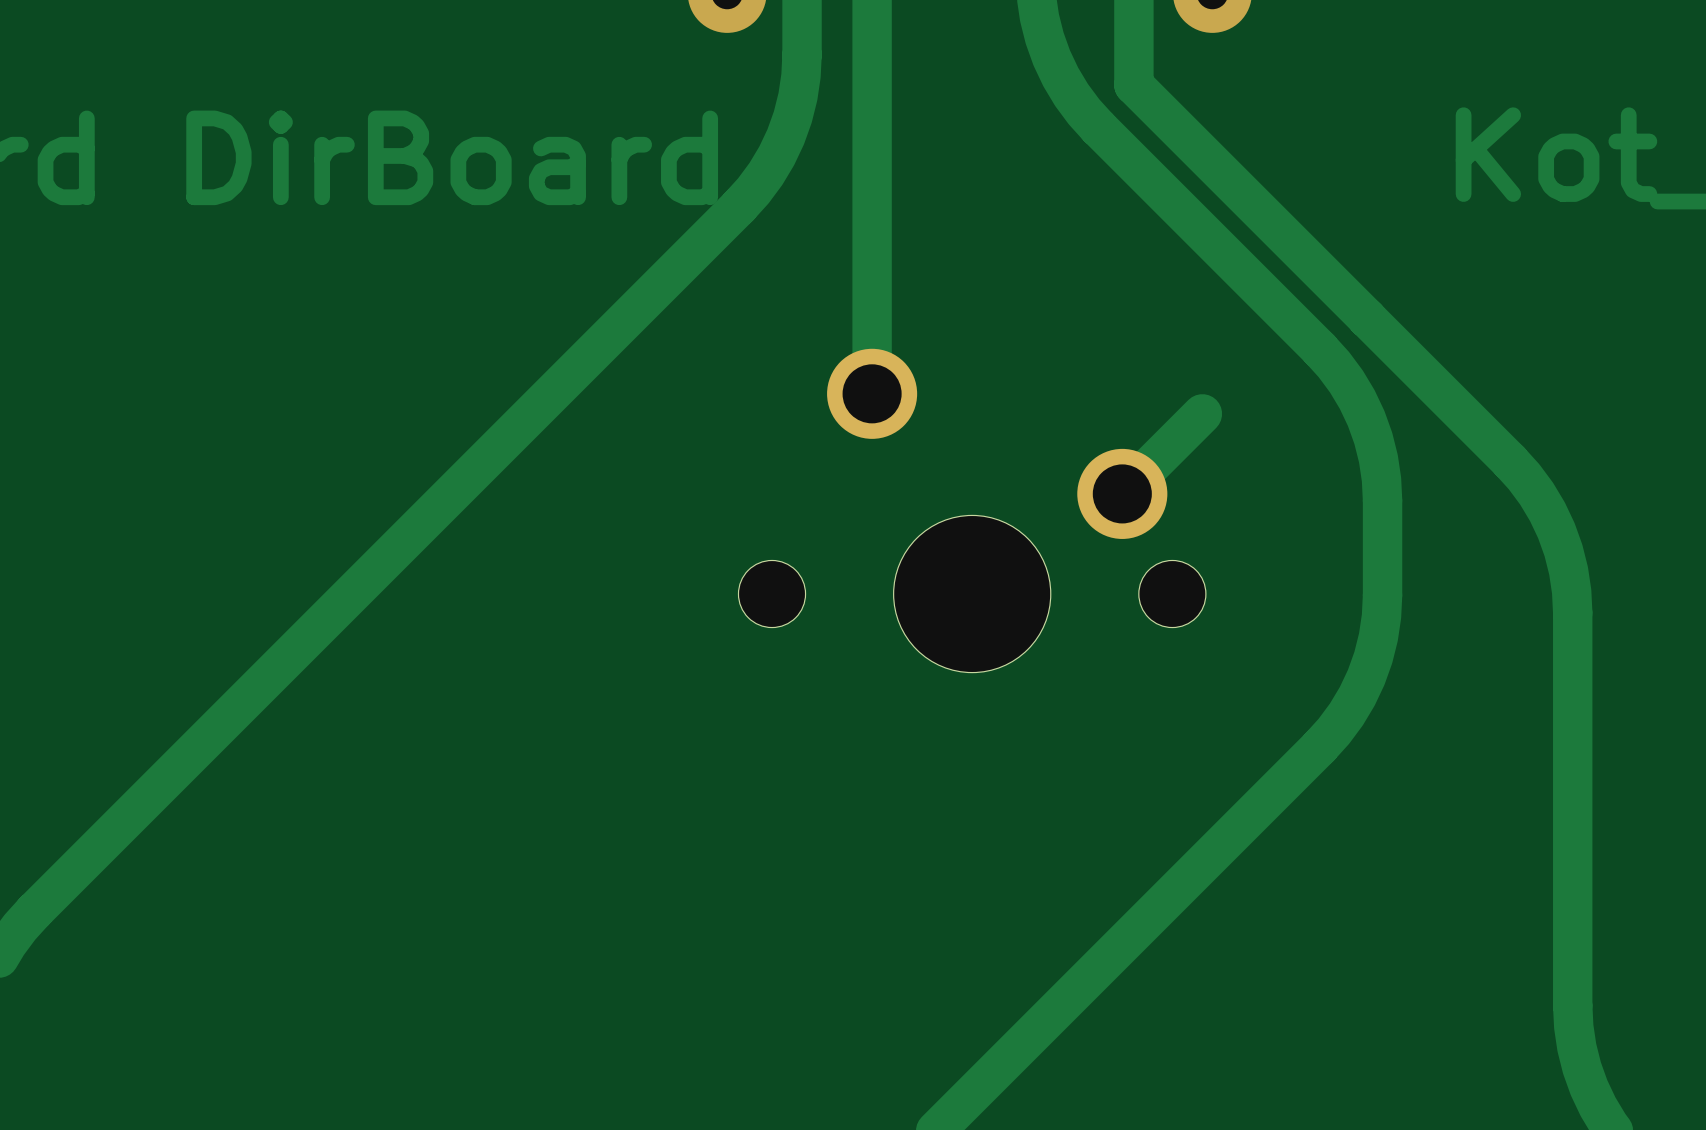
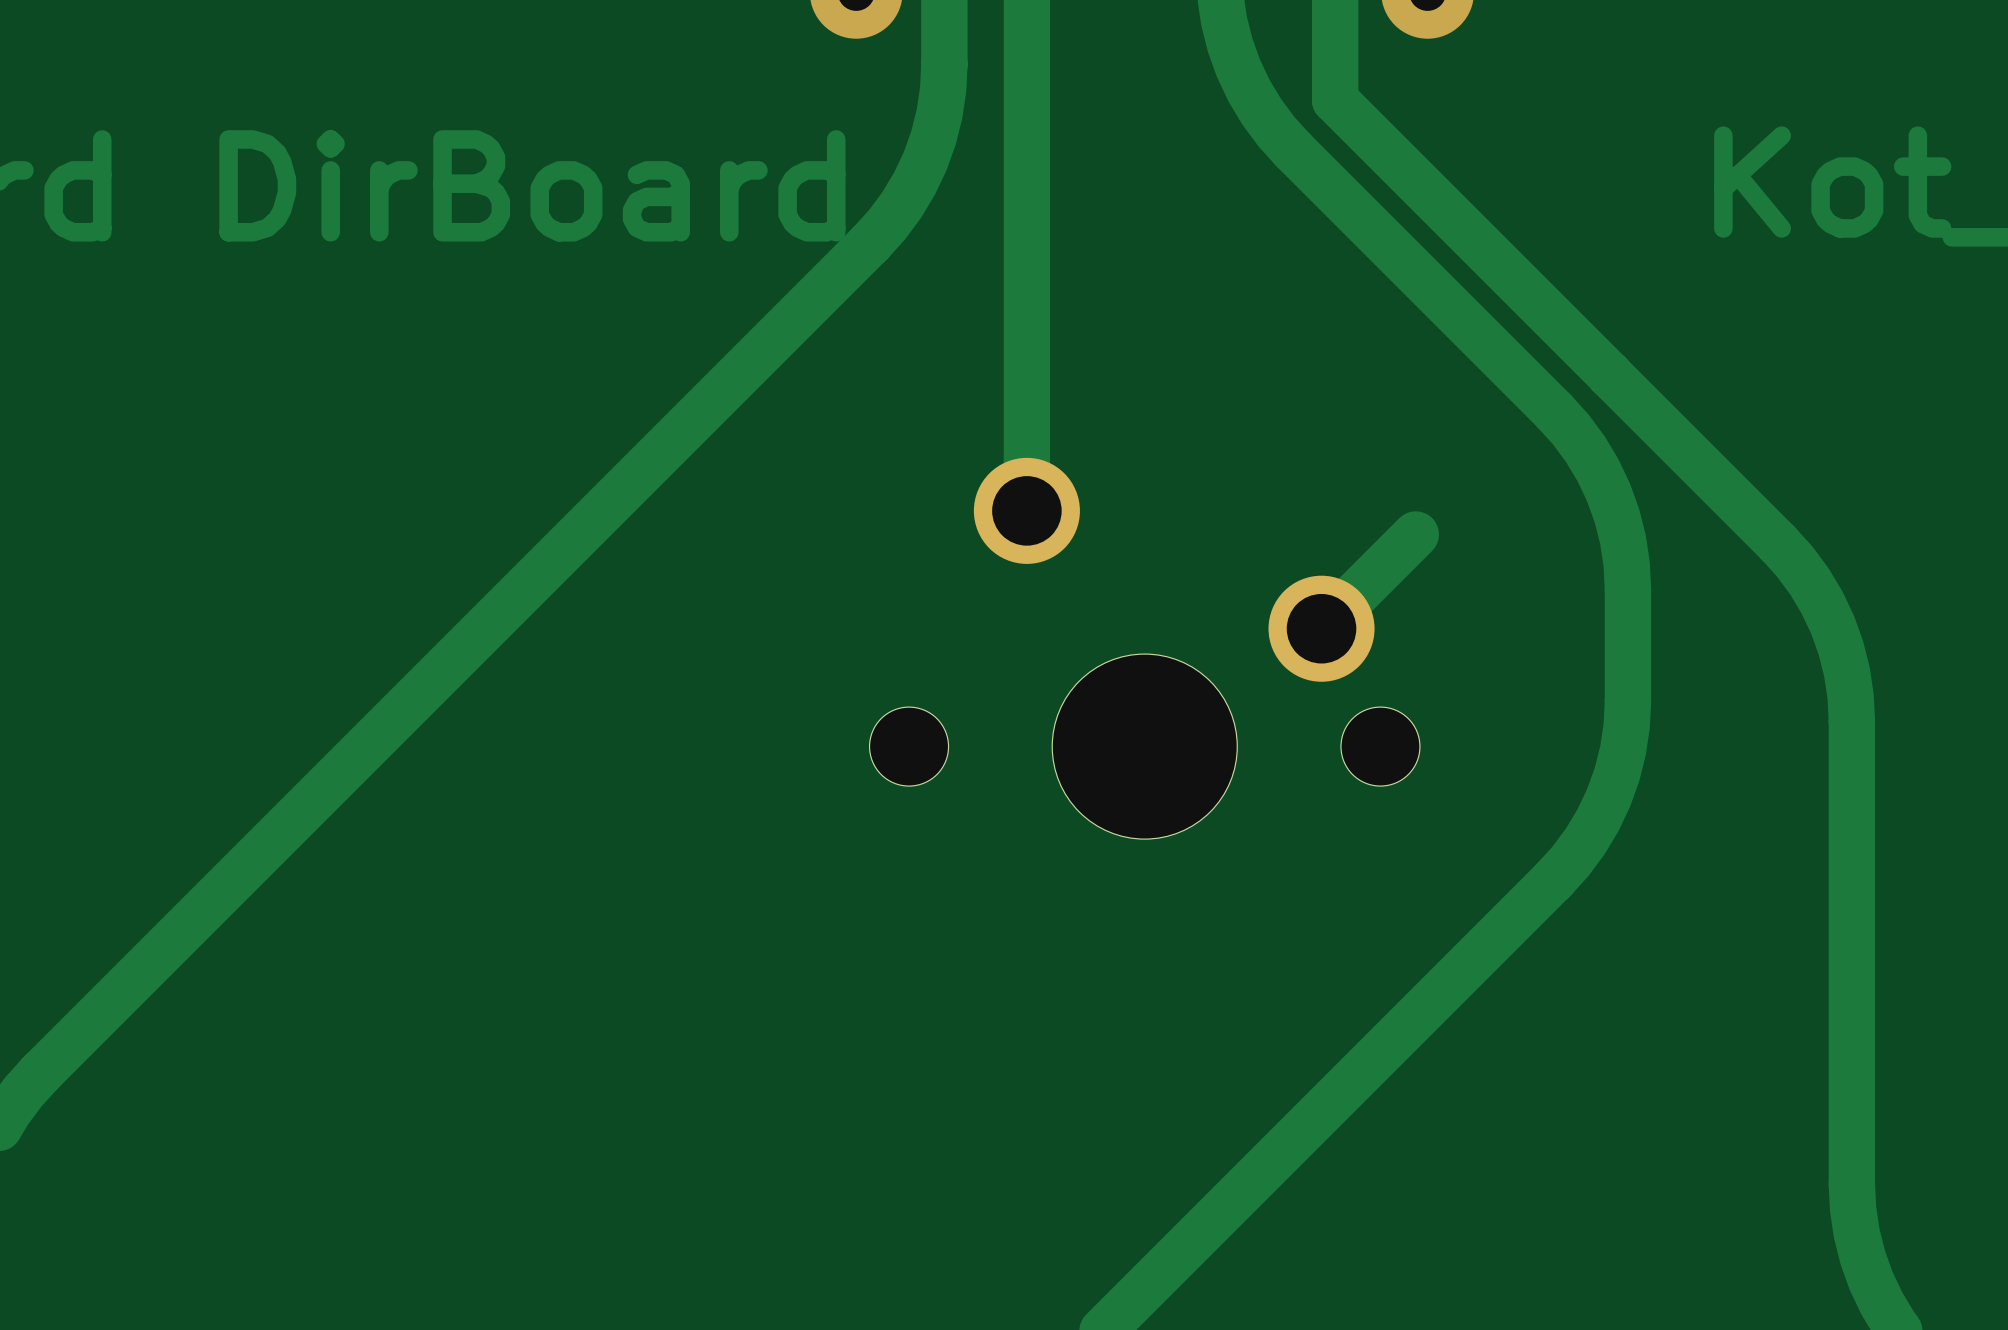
track: (1202, 413) (1122, 493) -> (1415, 534) (1321, 628)
part position: (972, 510) -> (1144, 648)

